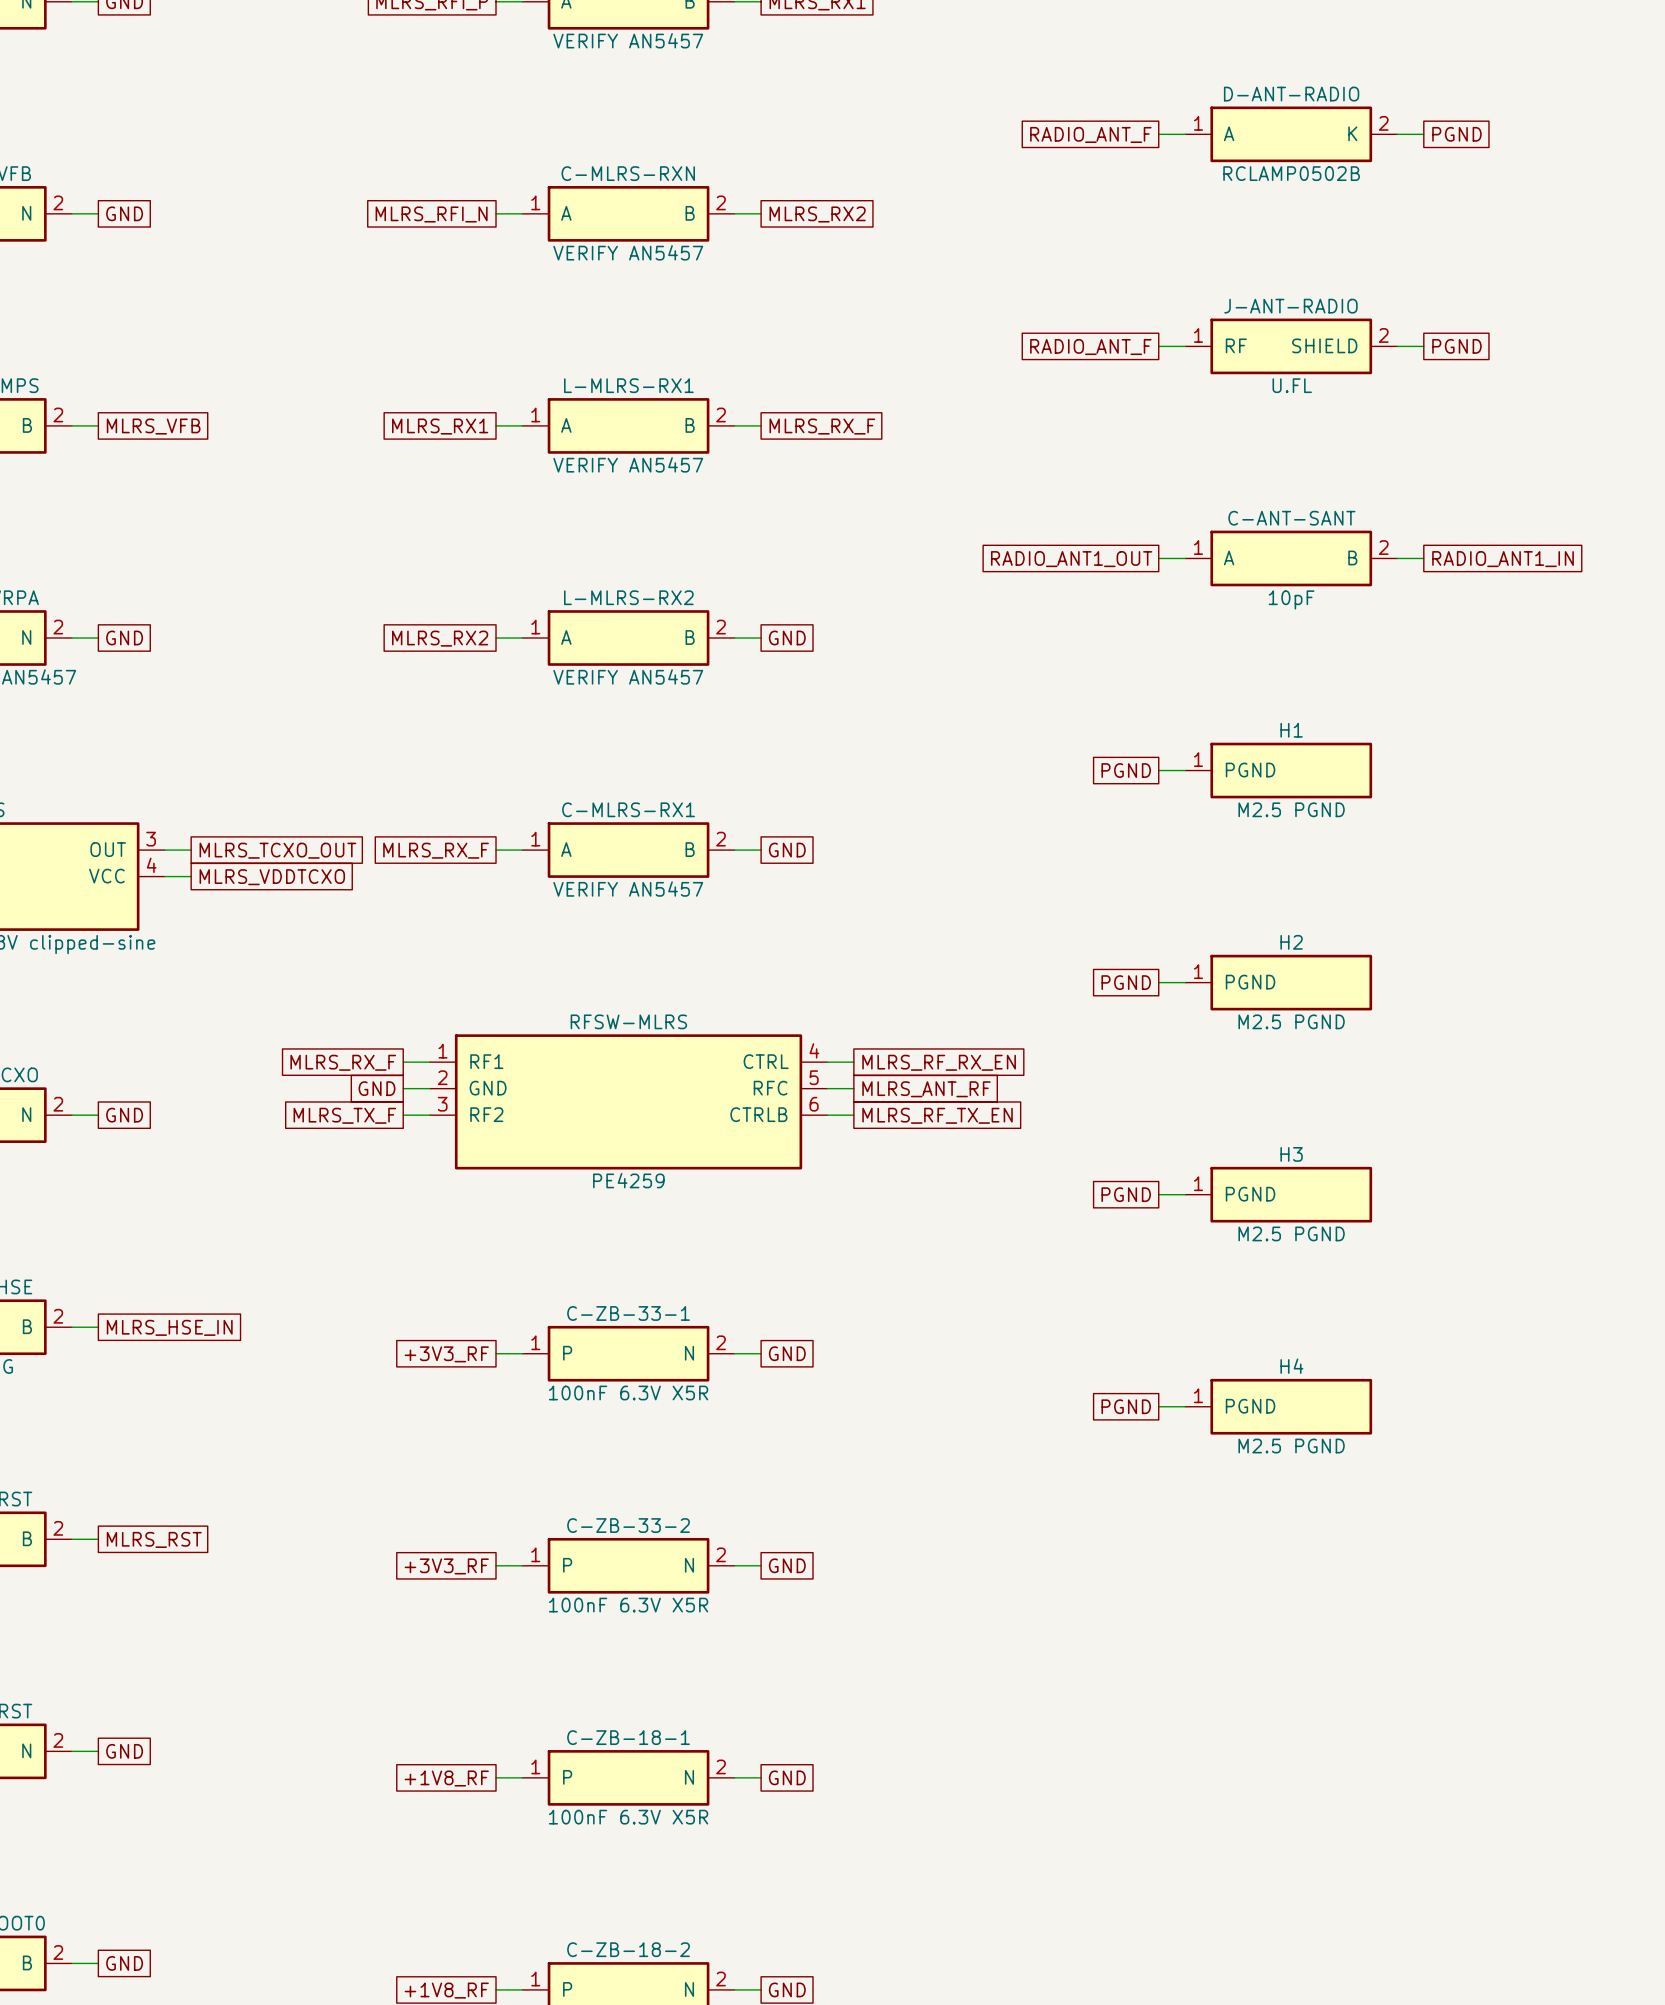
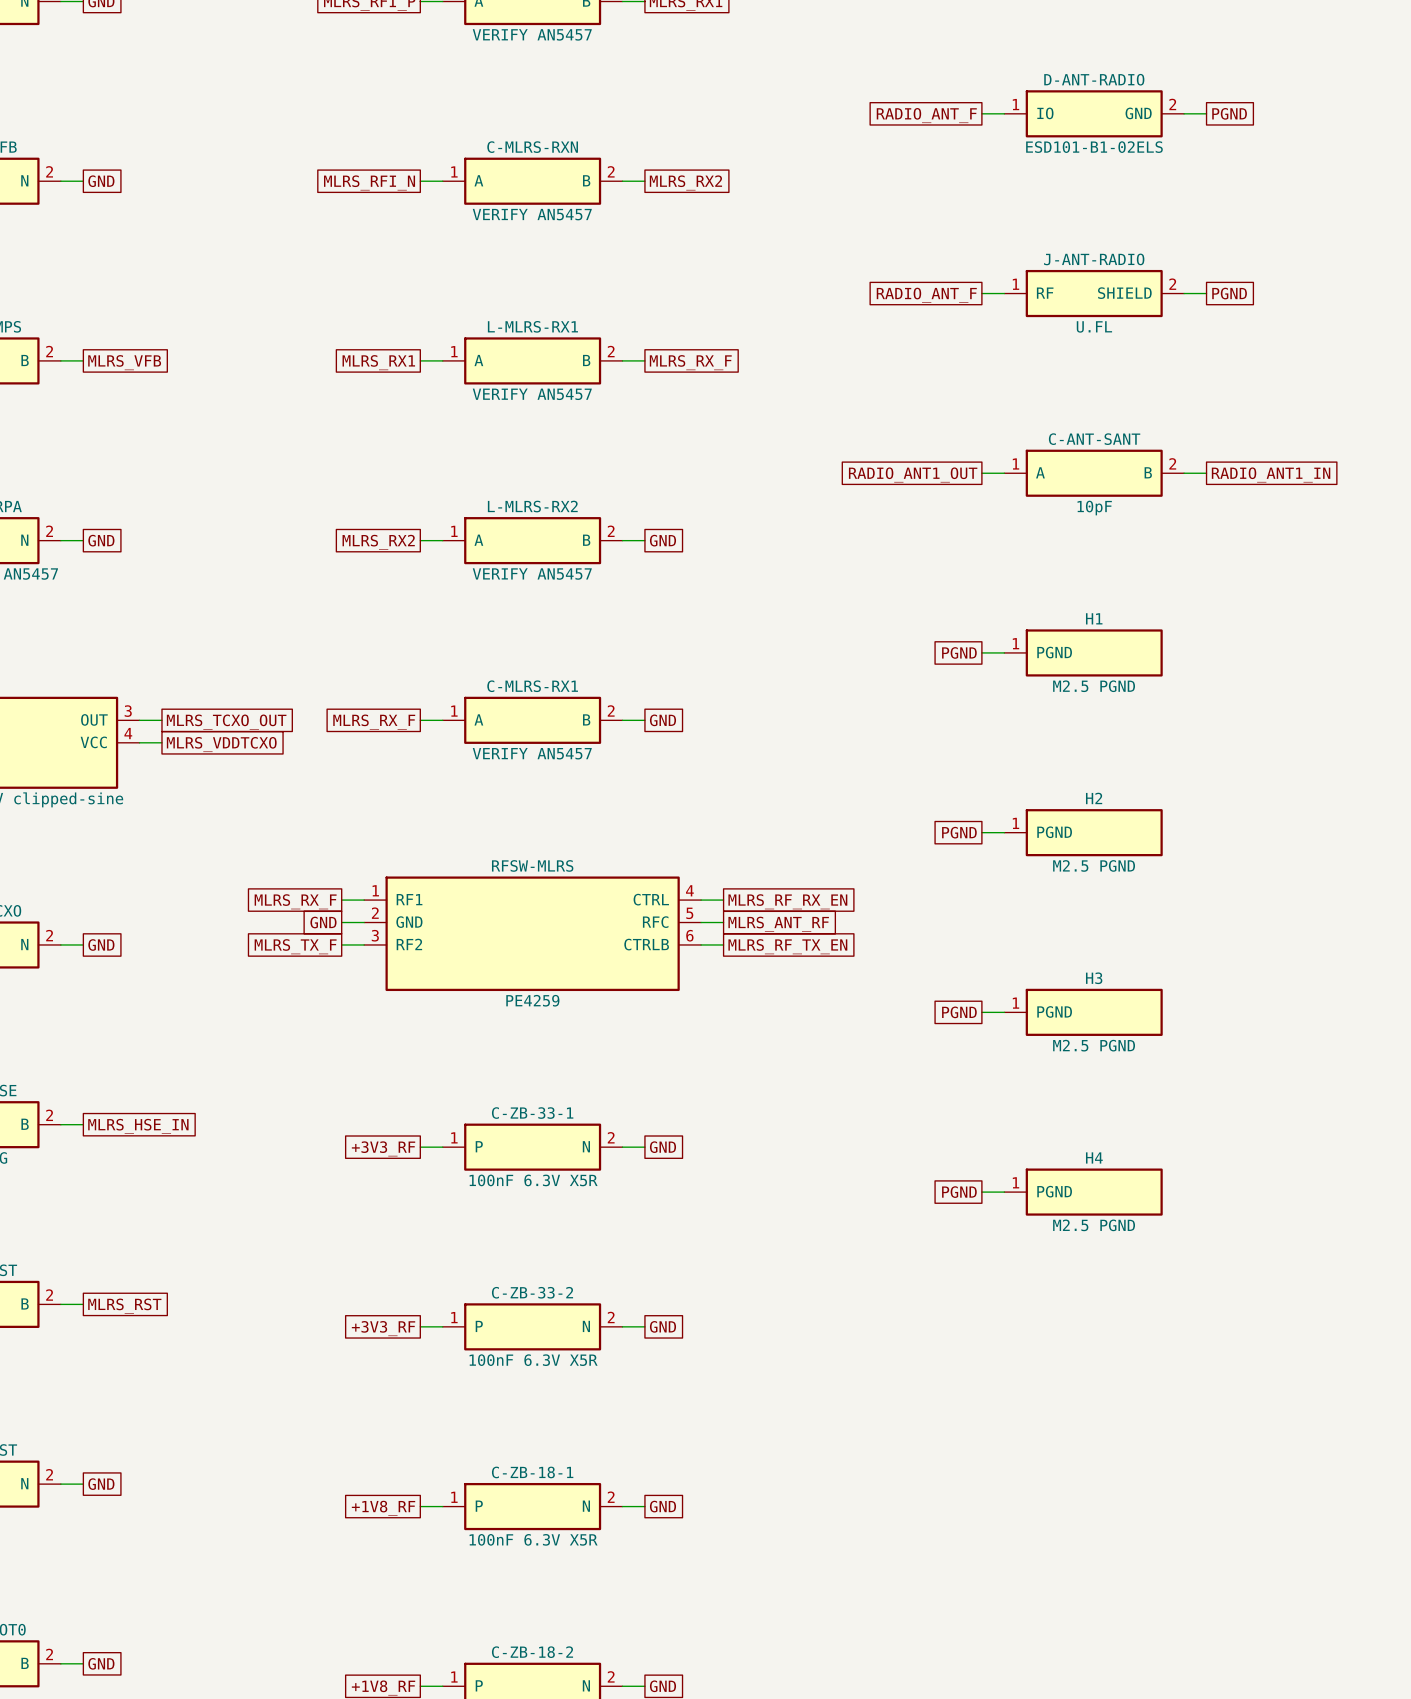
D-ANT-RADIO pin name: A (1229, 133) -> IO (1045, 113)
D-ANT-RADIO pin name: K (1352, 133) -> GND (1138, 113)
D-ANT-RADIO value: RCLAMP0502B (1291, 173) -> ESD101-B1-02ELS (1094, 147)

